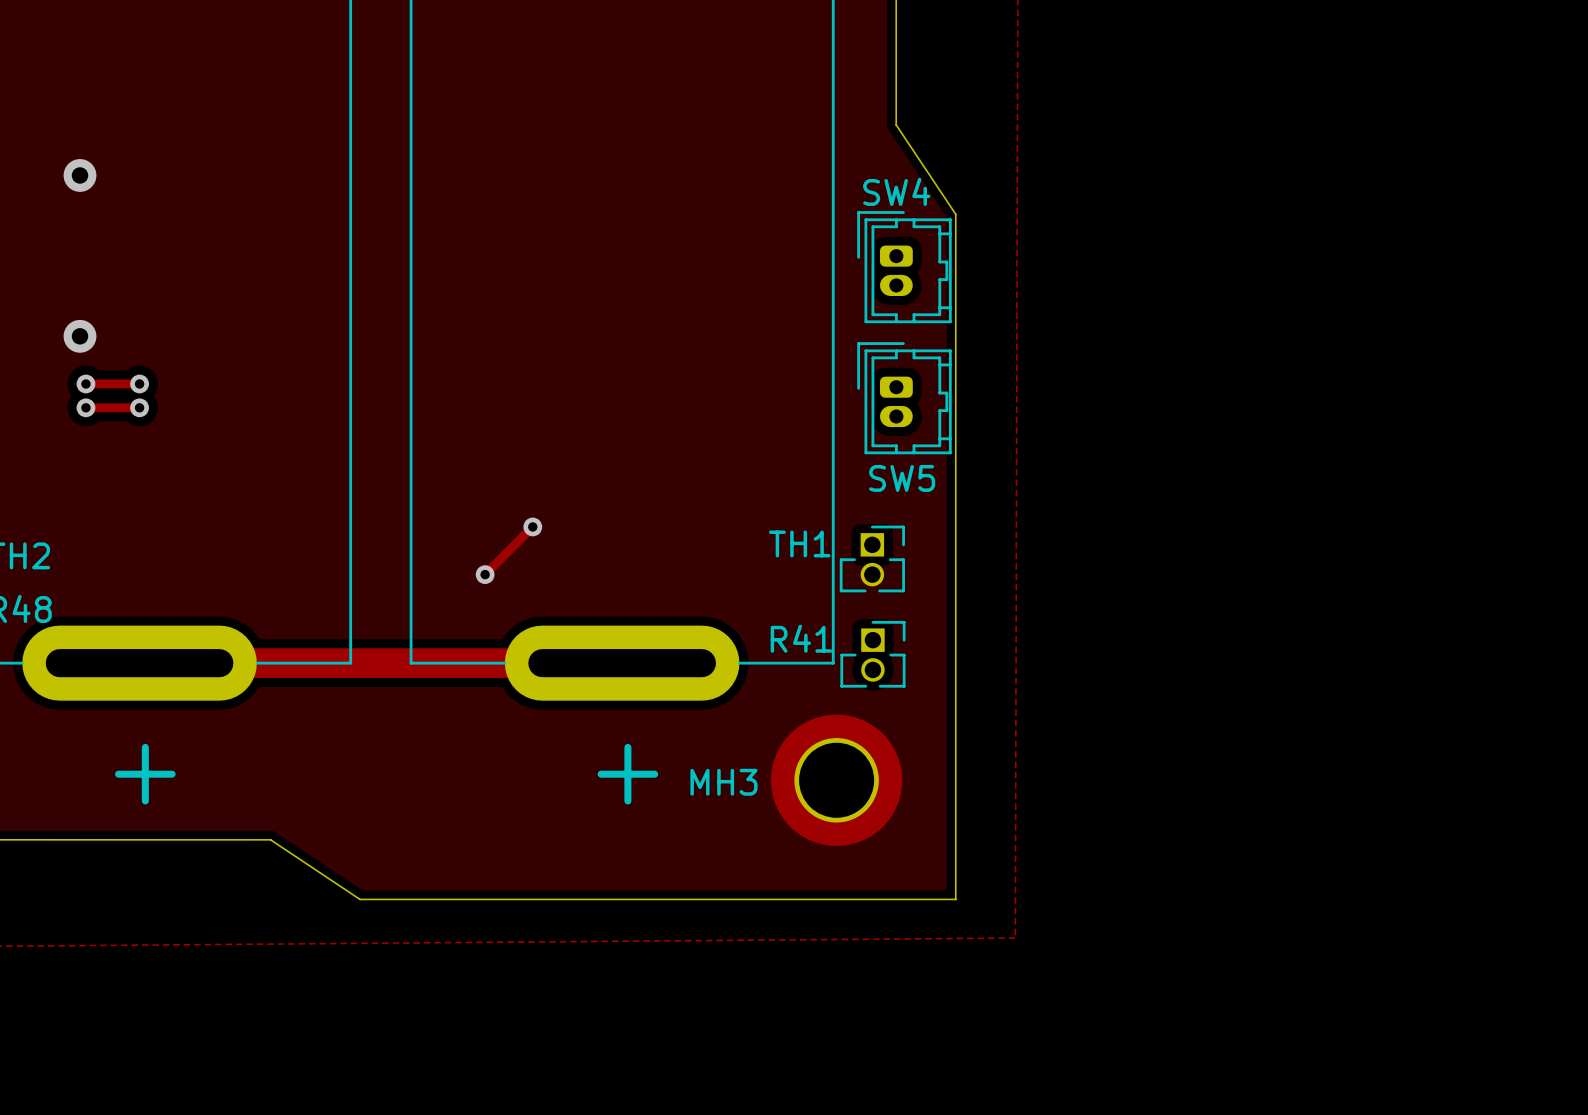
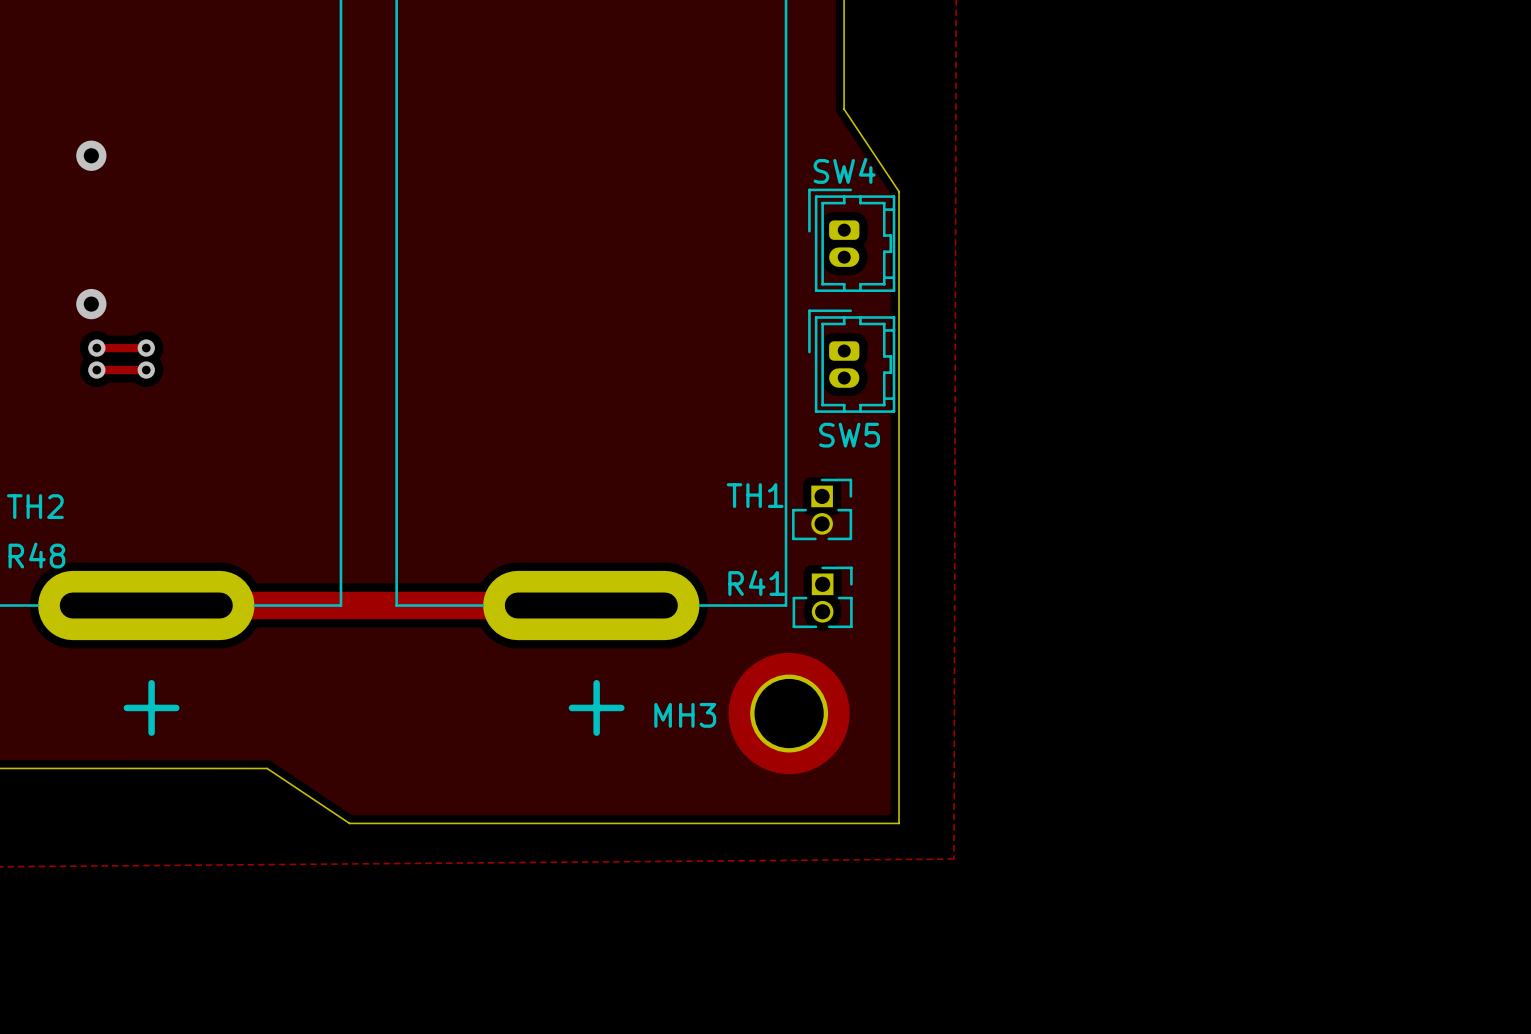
track: (532, 526) (485, 574) -> none
via: (532, 526) -> none
via: (485, 574) -> none

